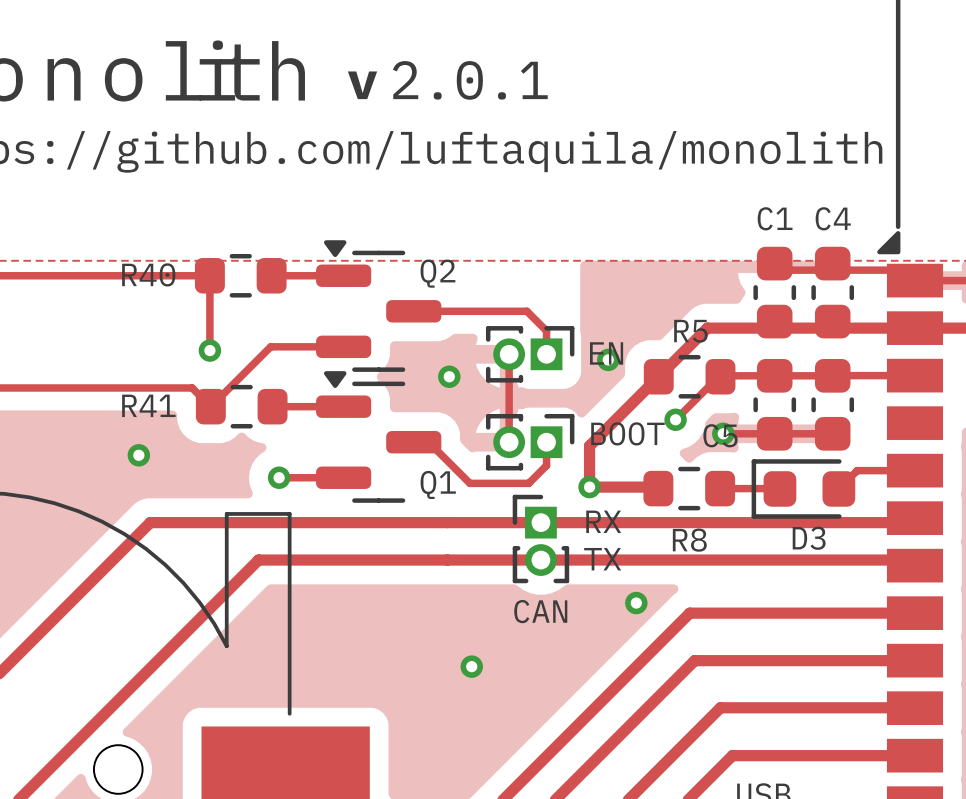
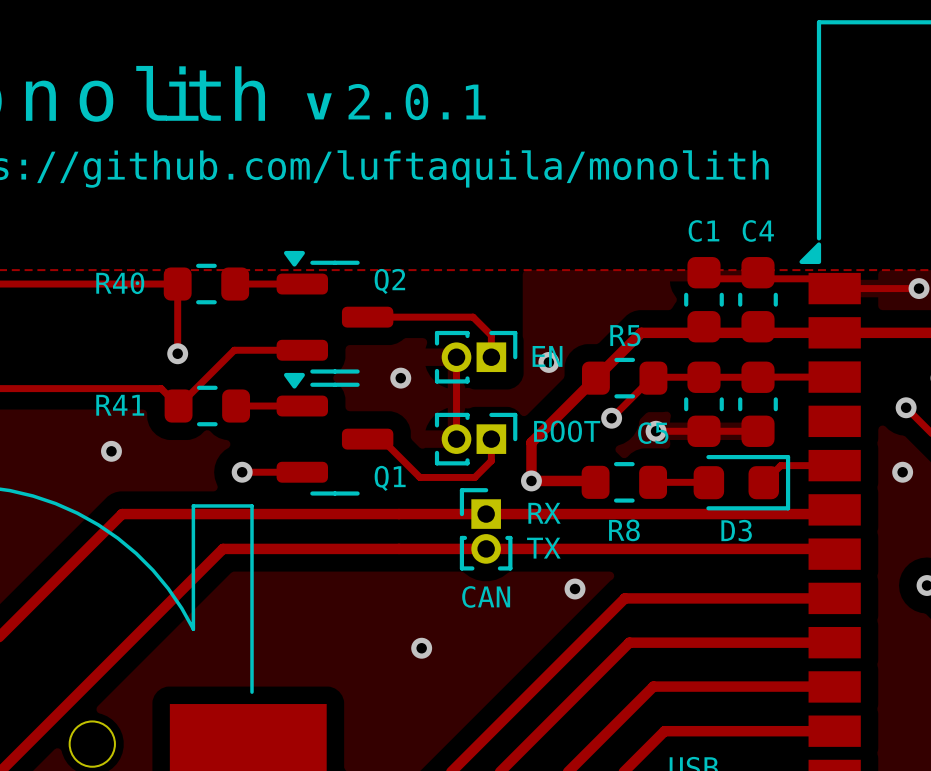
D3 rotation: 0° (803, 488) -> 180° (741, 482)

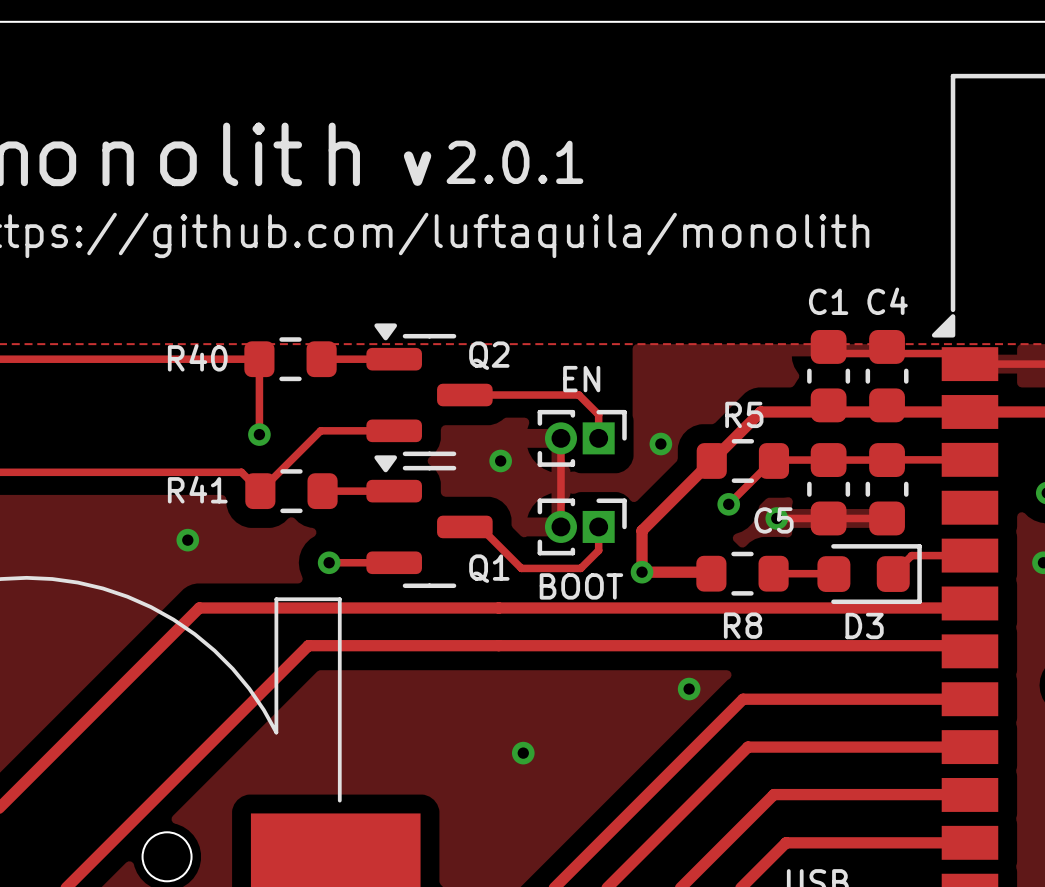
part value position: EN (547, 356) -> EN (581, 379)
part value position: BOOT (567, 431) -> BOOT (581, 586)
text: RX (544, 513) -> none
part: CAN (486, 529) -> none
text: TX (543, 548) -> none

